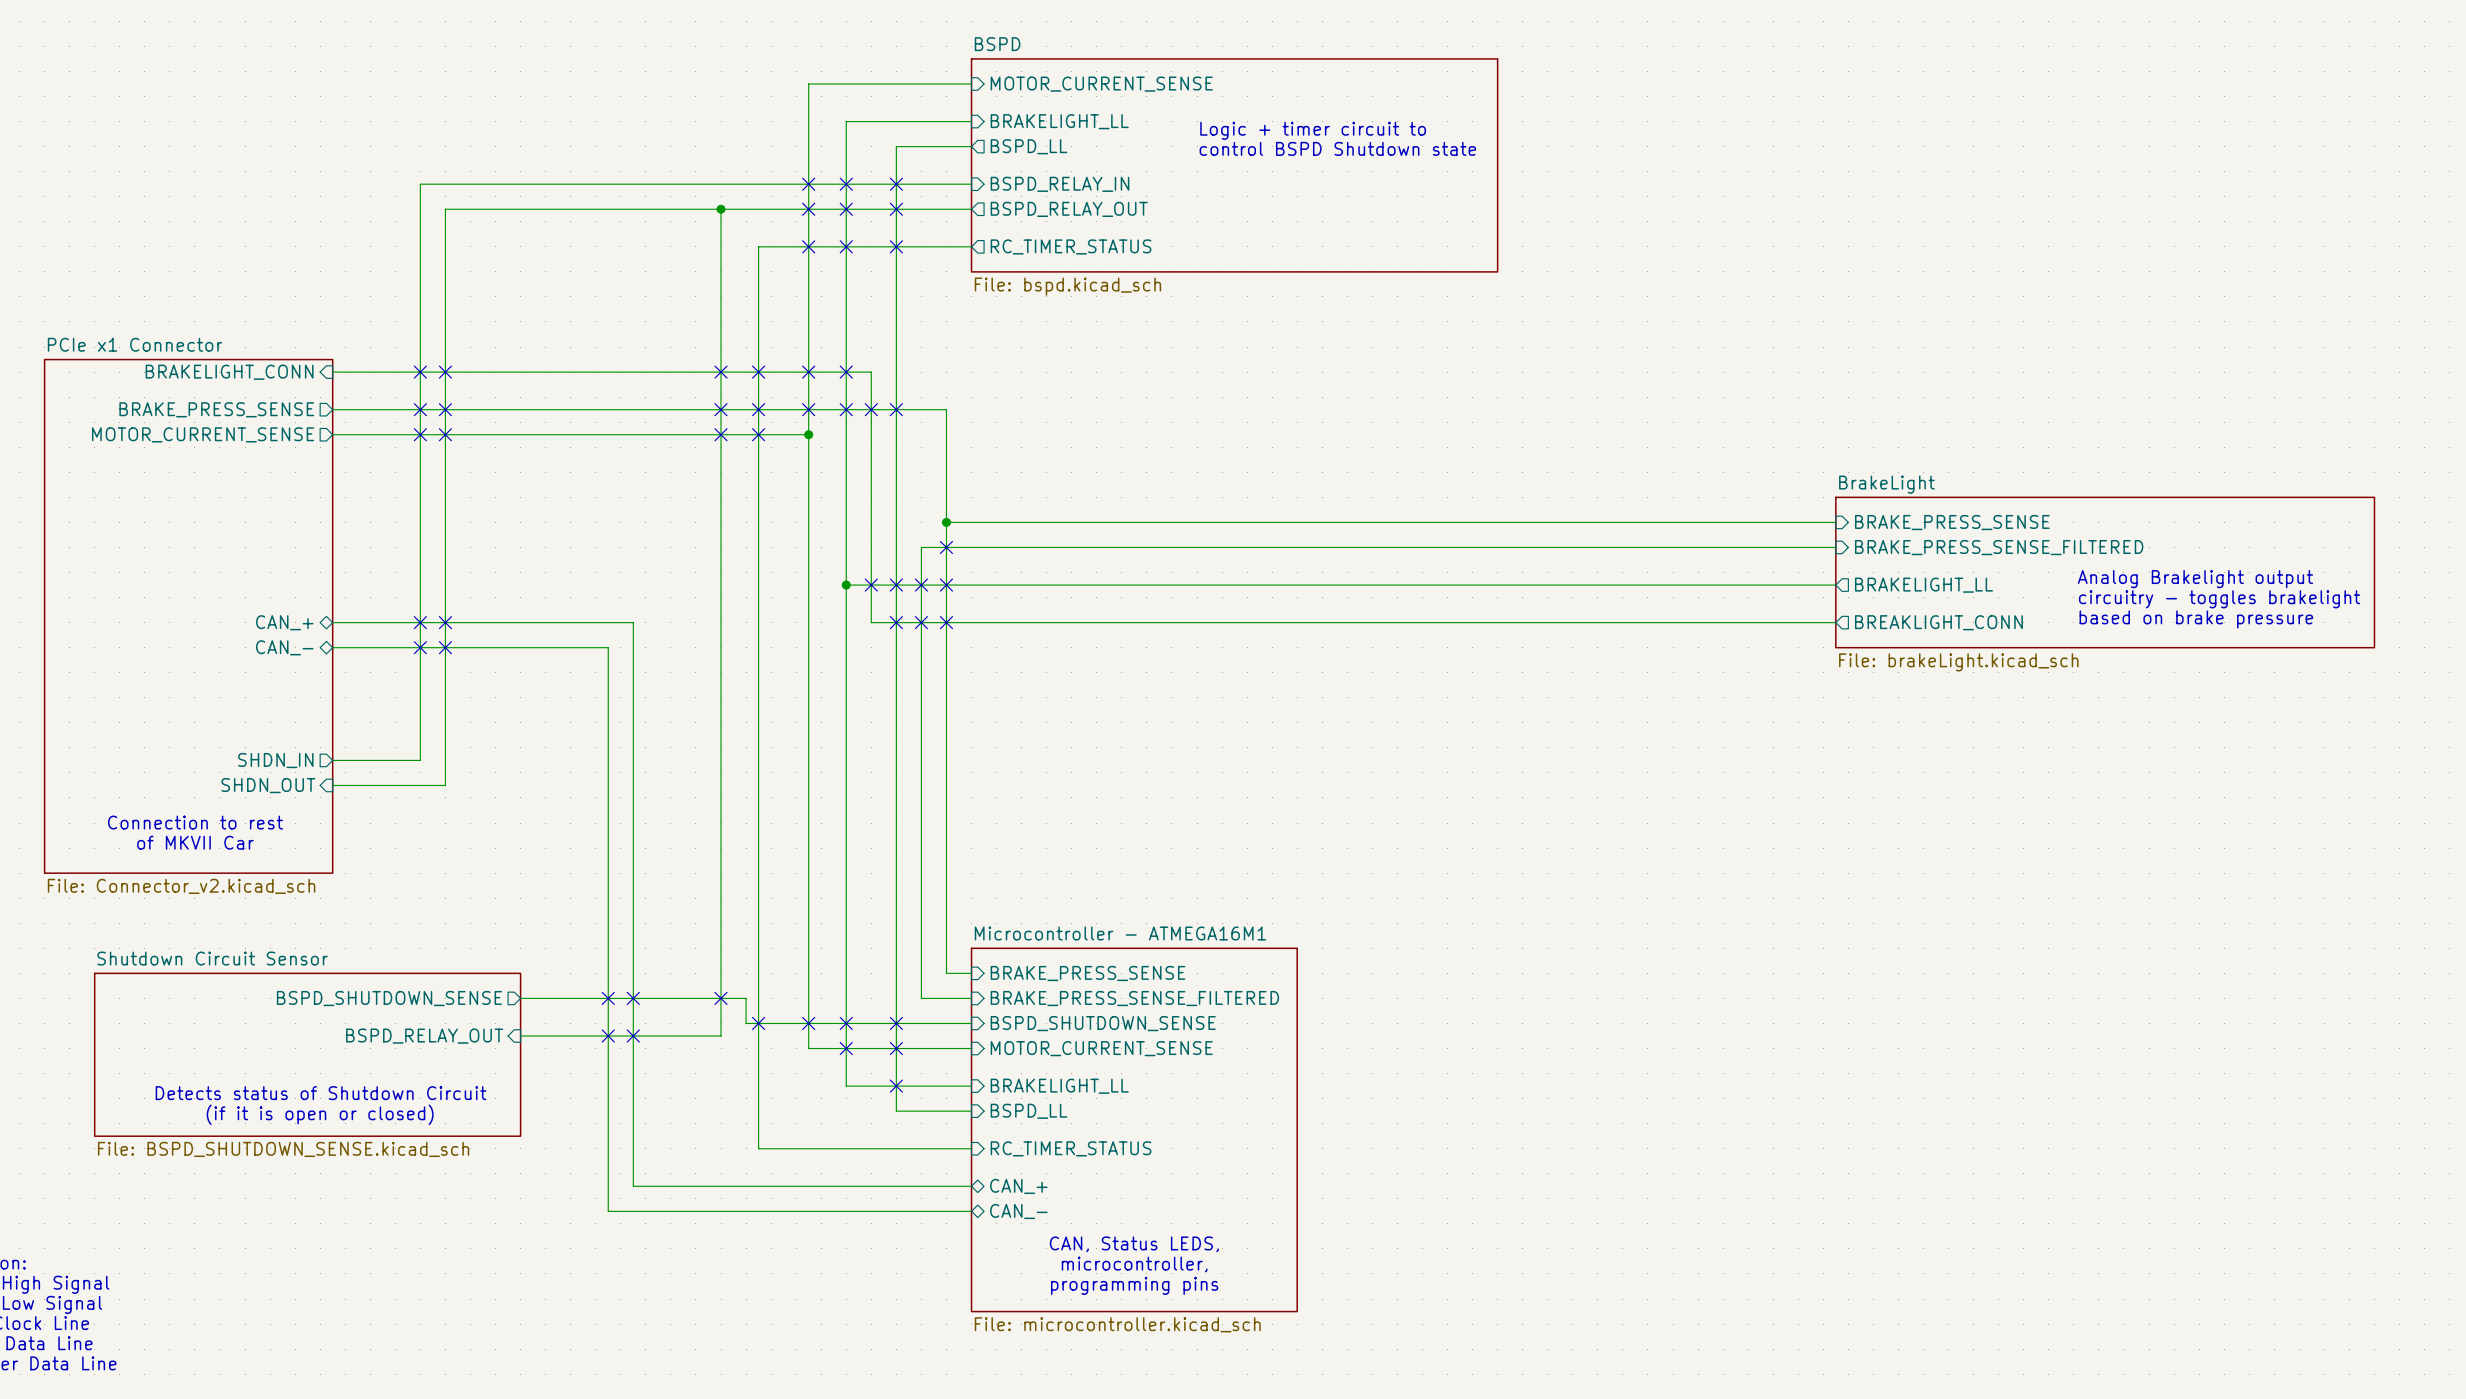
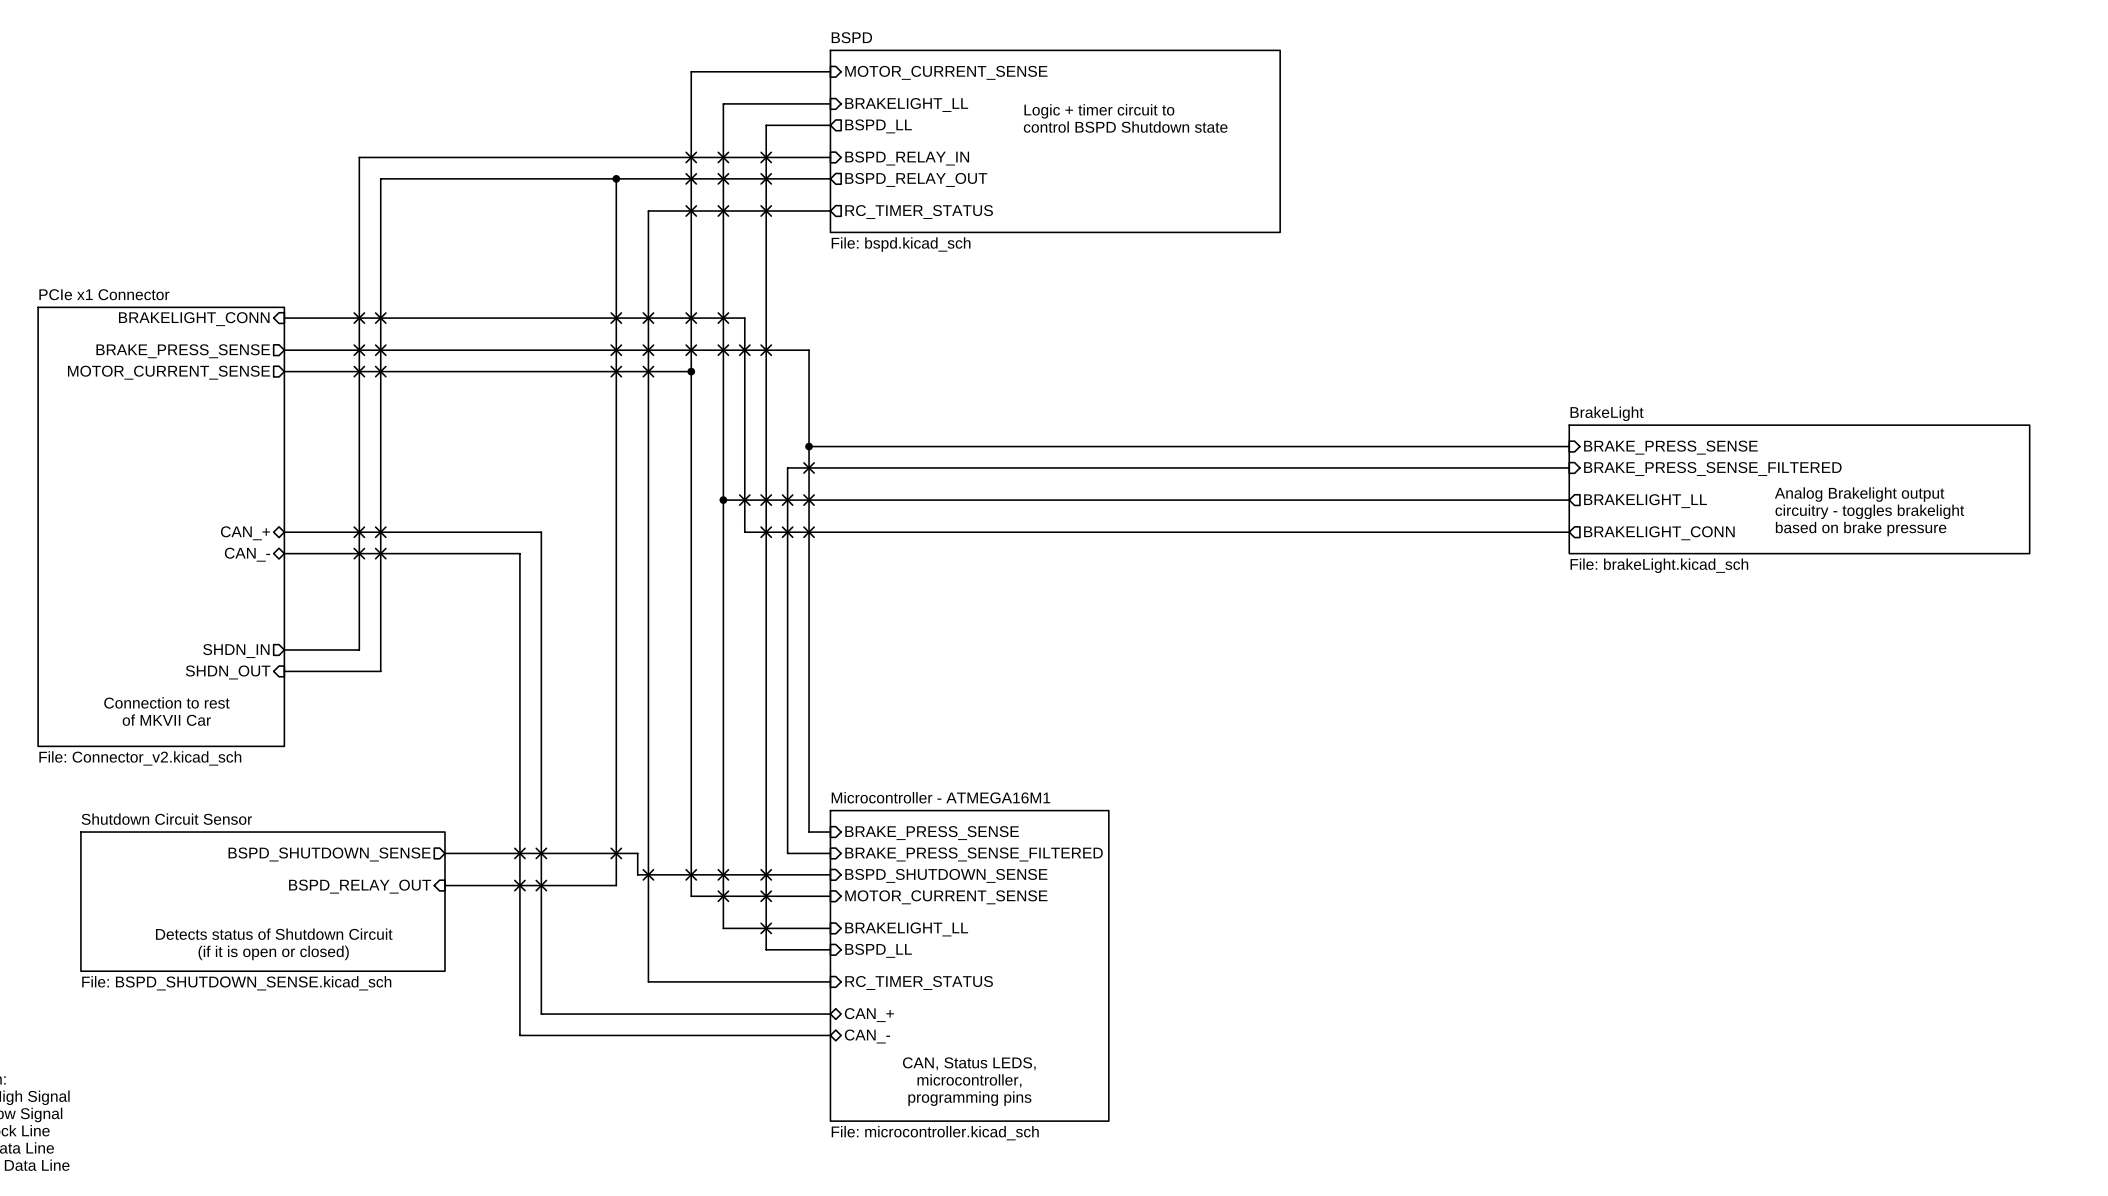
sheet pin: BREAKLIGHT_CONN (1938, 622) -> BRAKELIGHT_CONN (1659, 533)

